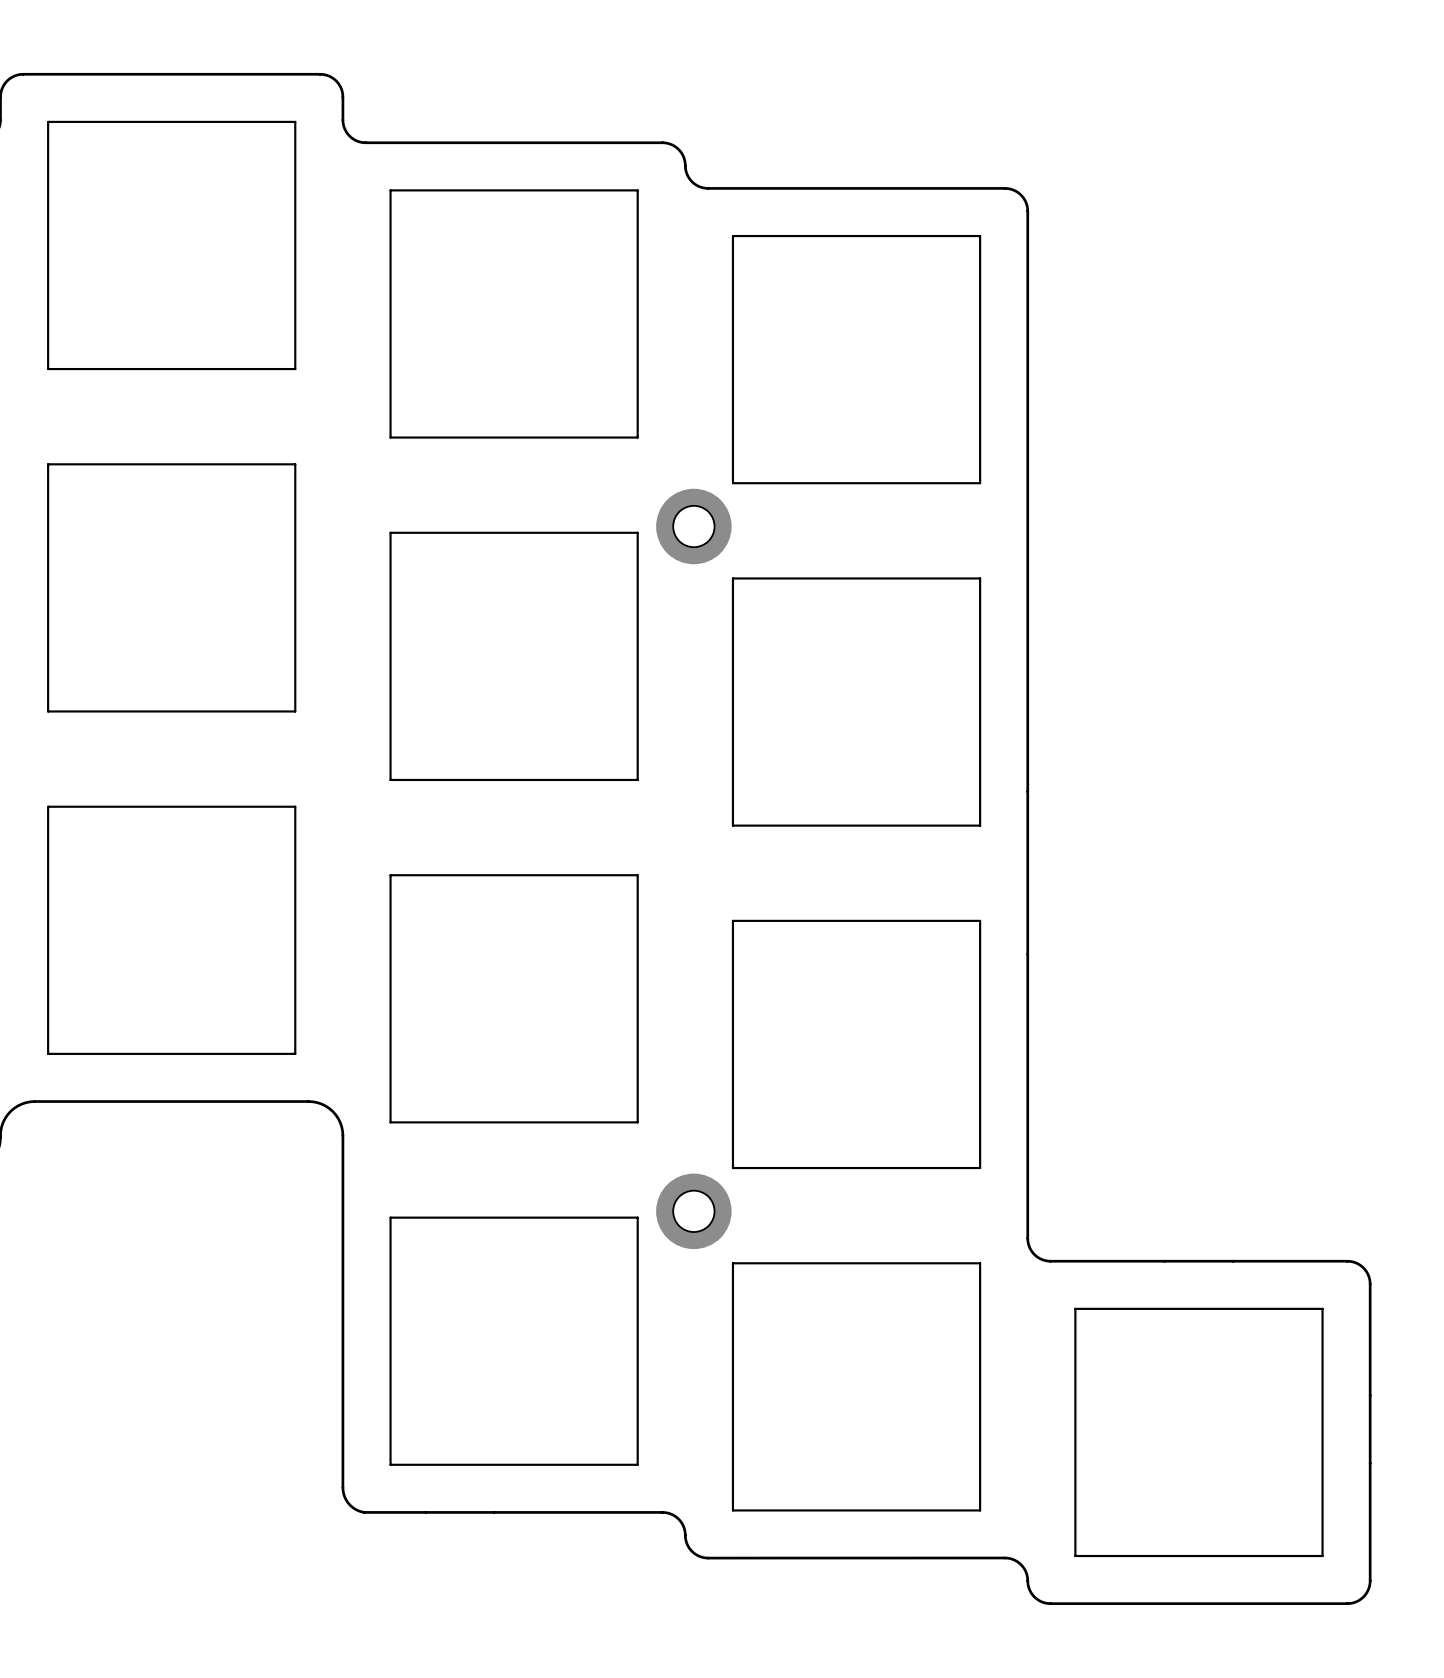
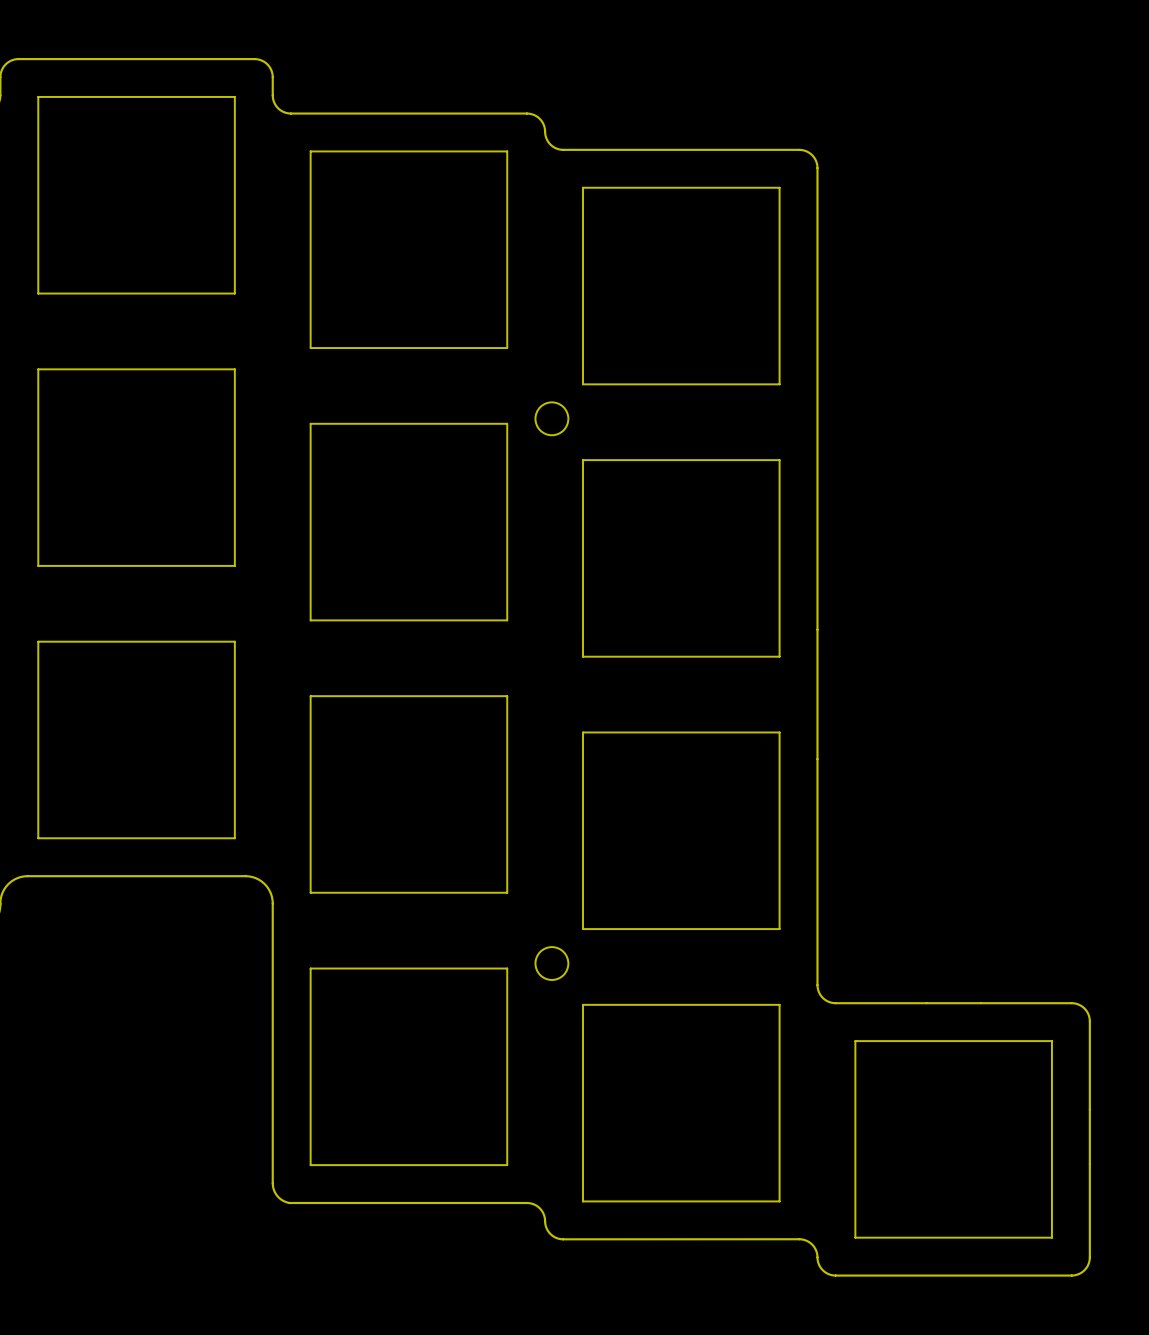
drawing: none -> [534, 401, 570, 436]
part: (693, 526) -> none
drawing: none -> [534, 946, 570, 981]
part: (693, 1211) -> none

